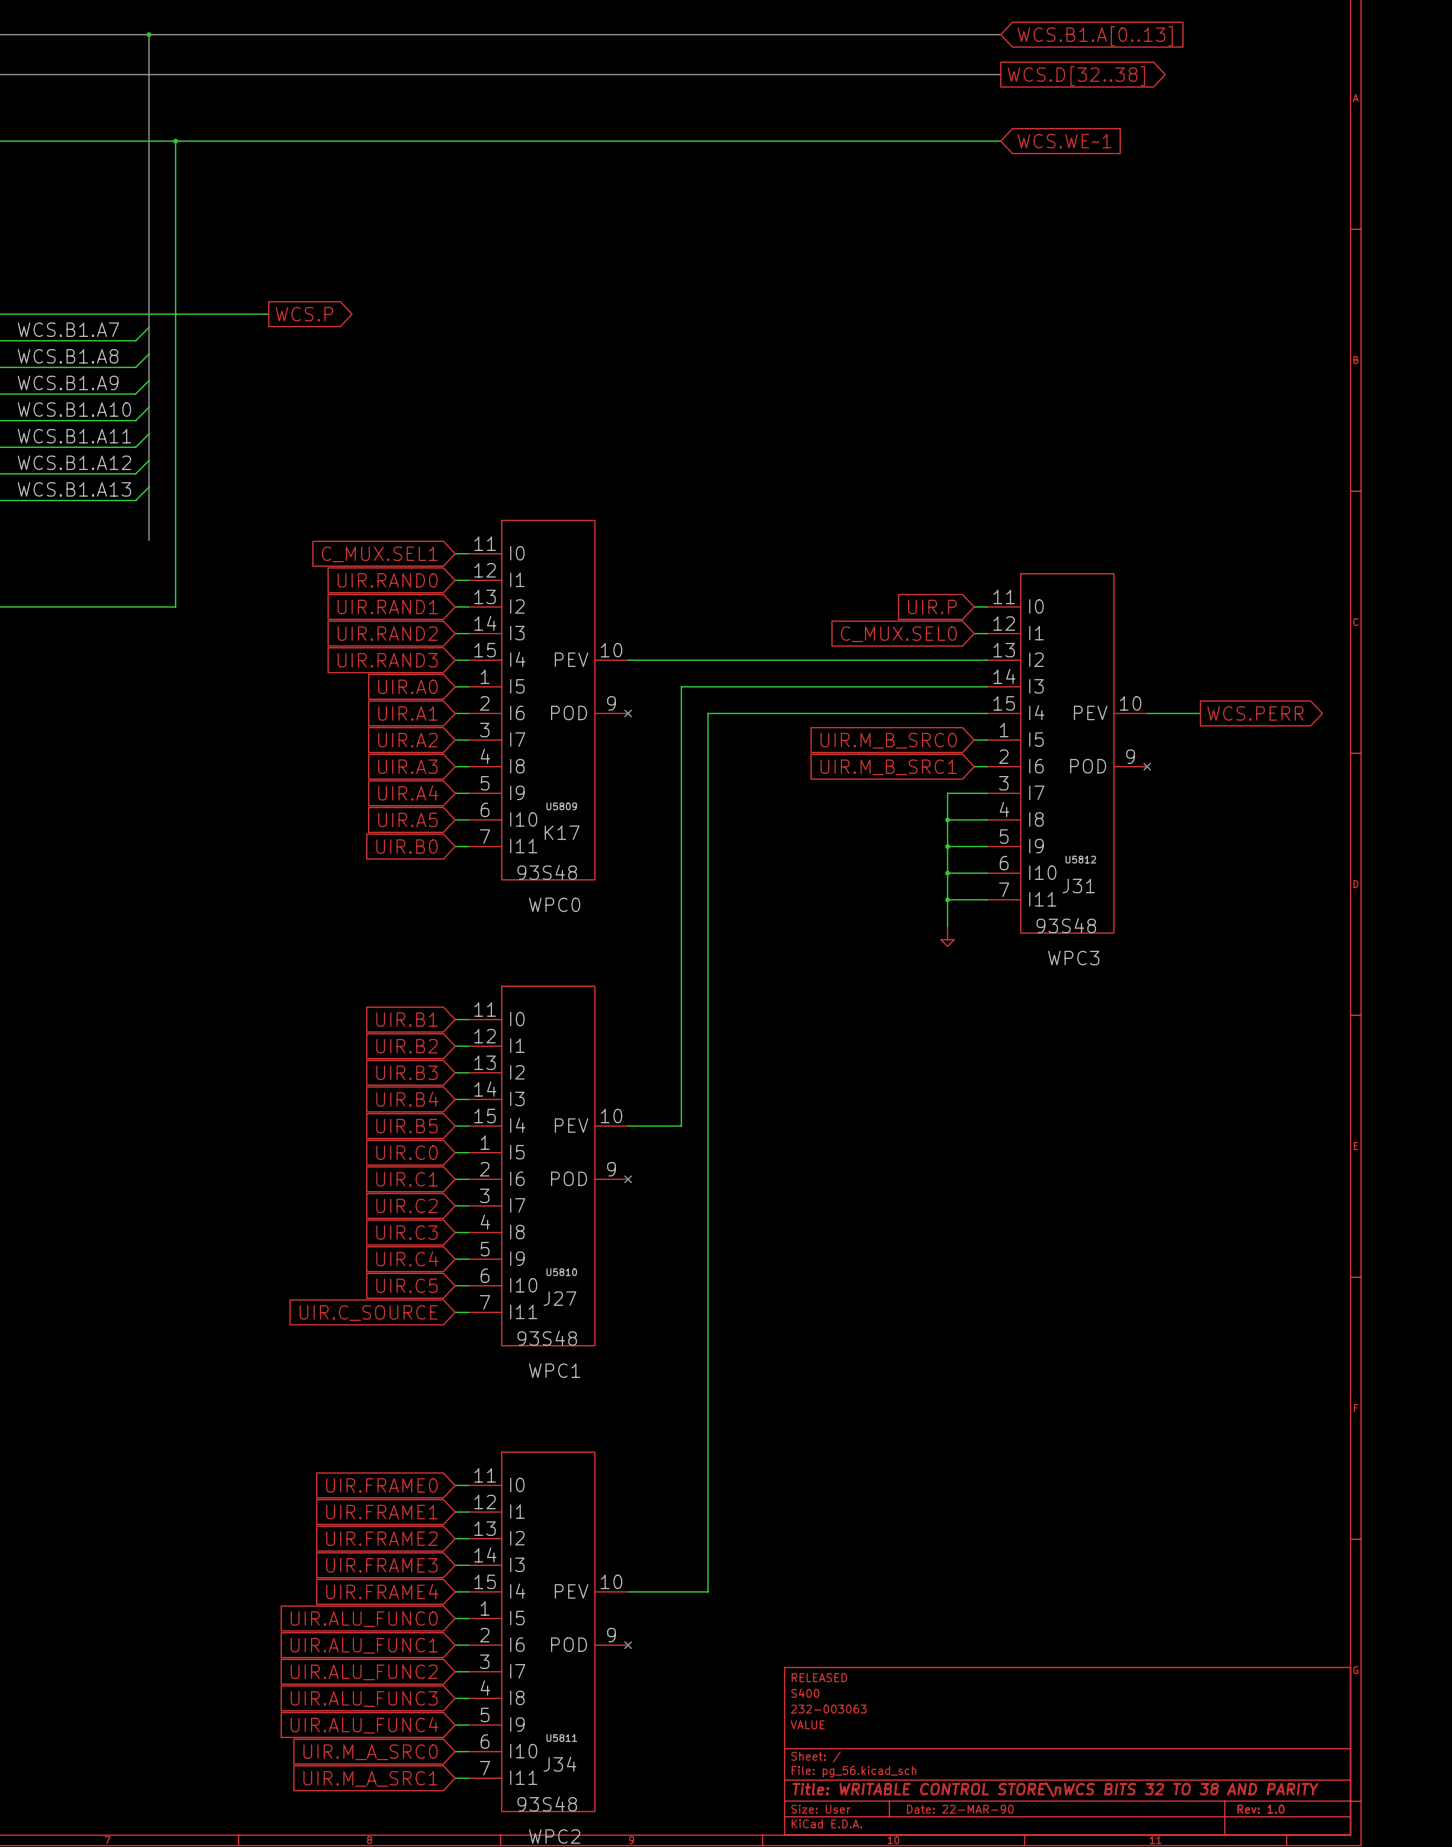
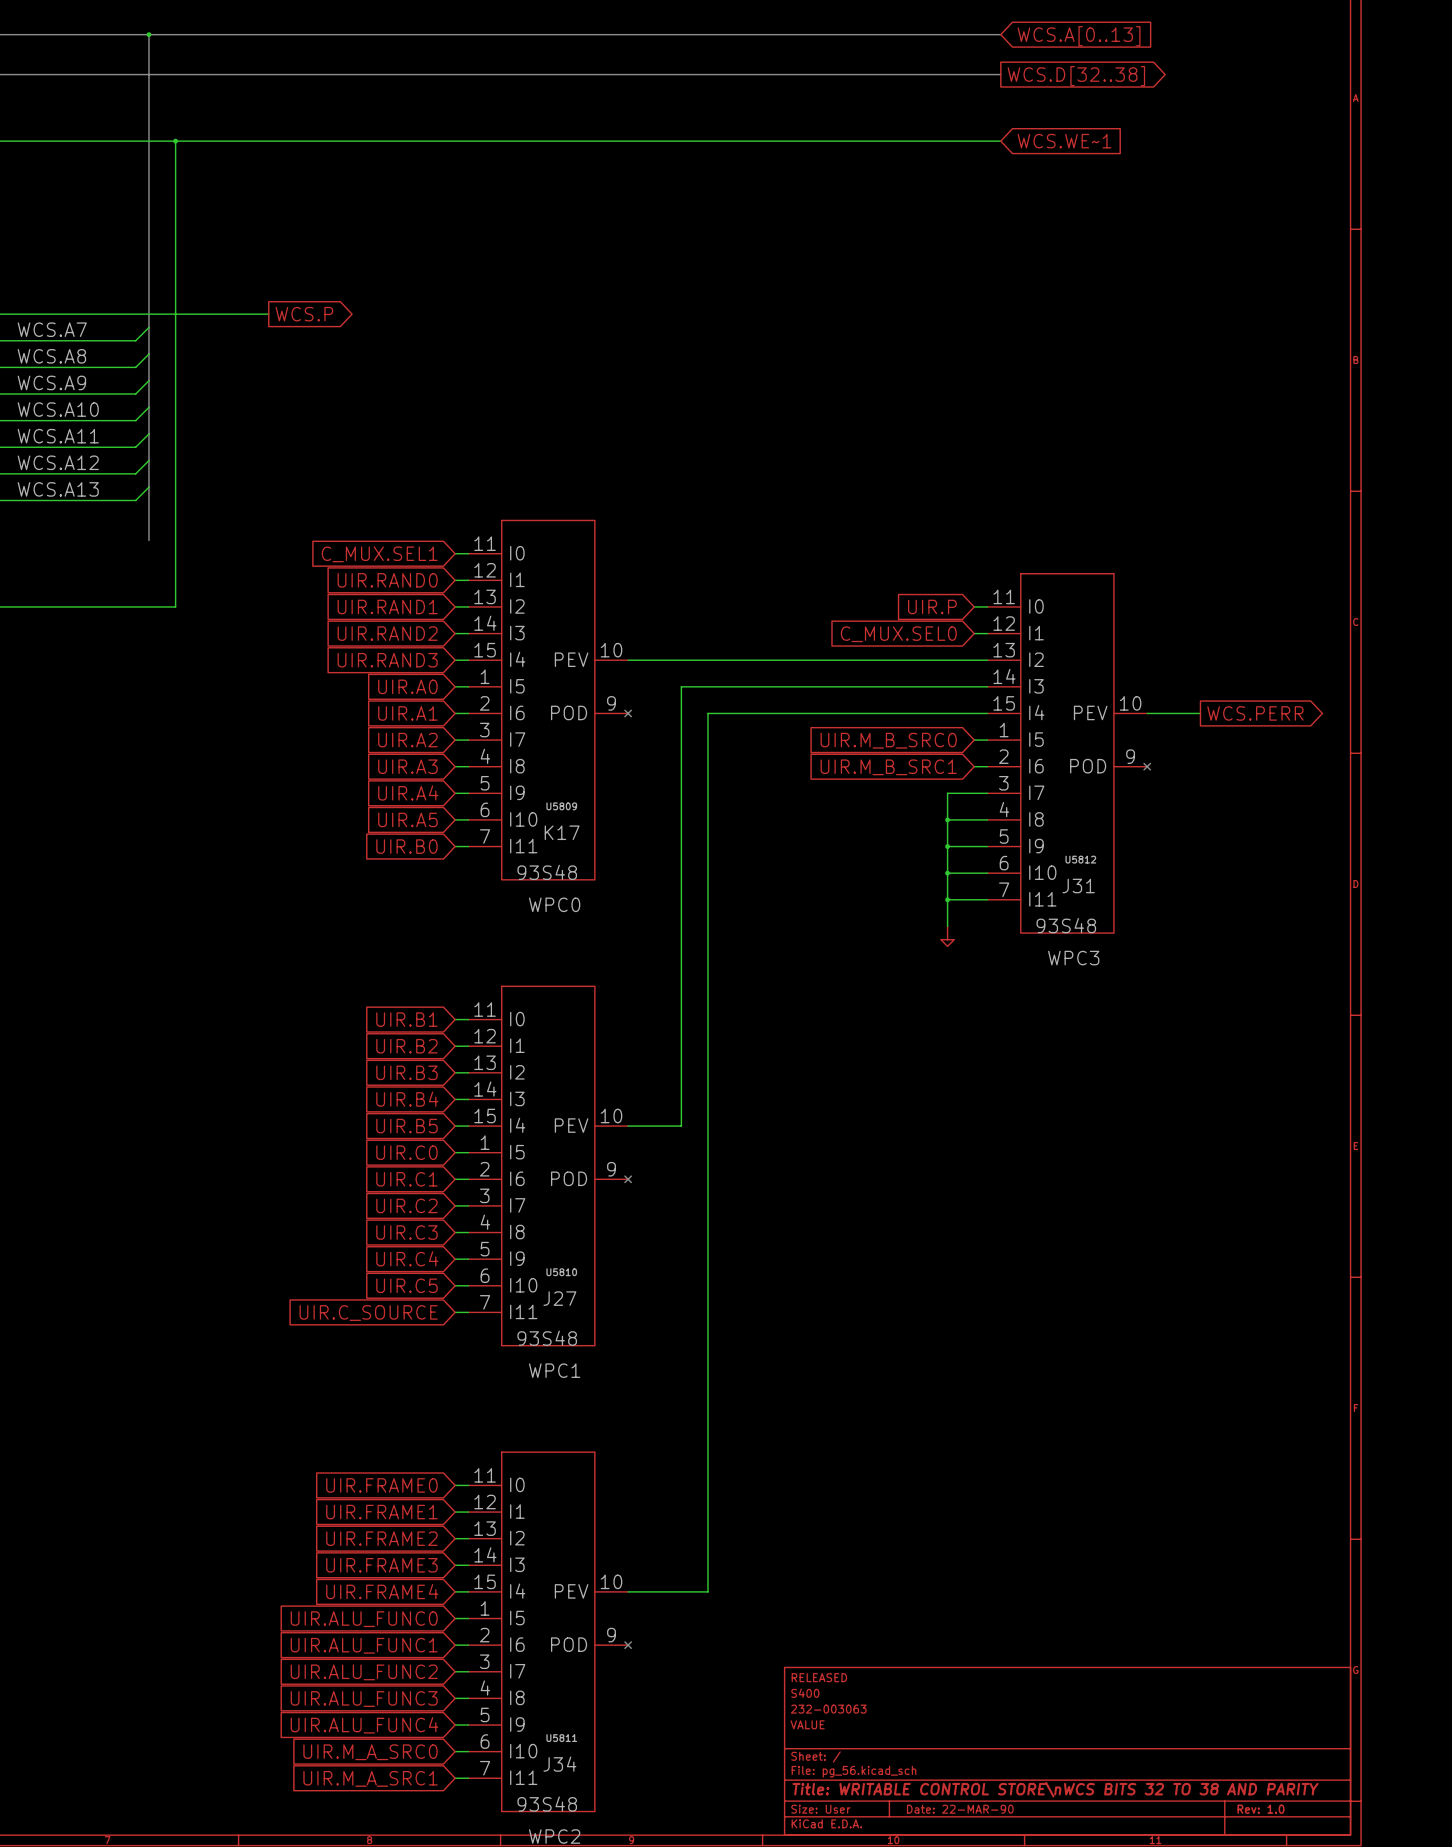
global label: WCS.B1.A[0..13] (1095, 36) -> WCS.A[0..13] (1079, 36)
label: WCS.B1.A7 (68, 329) -> WCS.A7 (52, 329)
label: WCS.B1.A8 (68, 356) -> WCS.A8 (51, 356)
label: WCS.B1.A9 (68, 382) -> WCS.A9 (51, 382)
label: WCS.B1.A10 (74, 409) -> WCS.A10 (58, 409)
label: WCS.B1.A11 (74, 436) -> WCS.A11 (58, 436)
label: WCS.B1.A12 (74, 462) -> WCS.A12 (58, 462)
label: WCS.B1.A13 (74, 489) -> WCS.A13 (58, 489)

